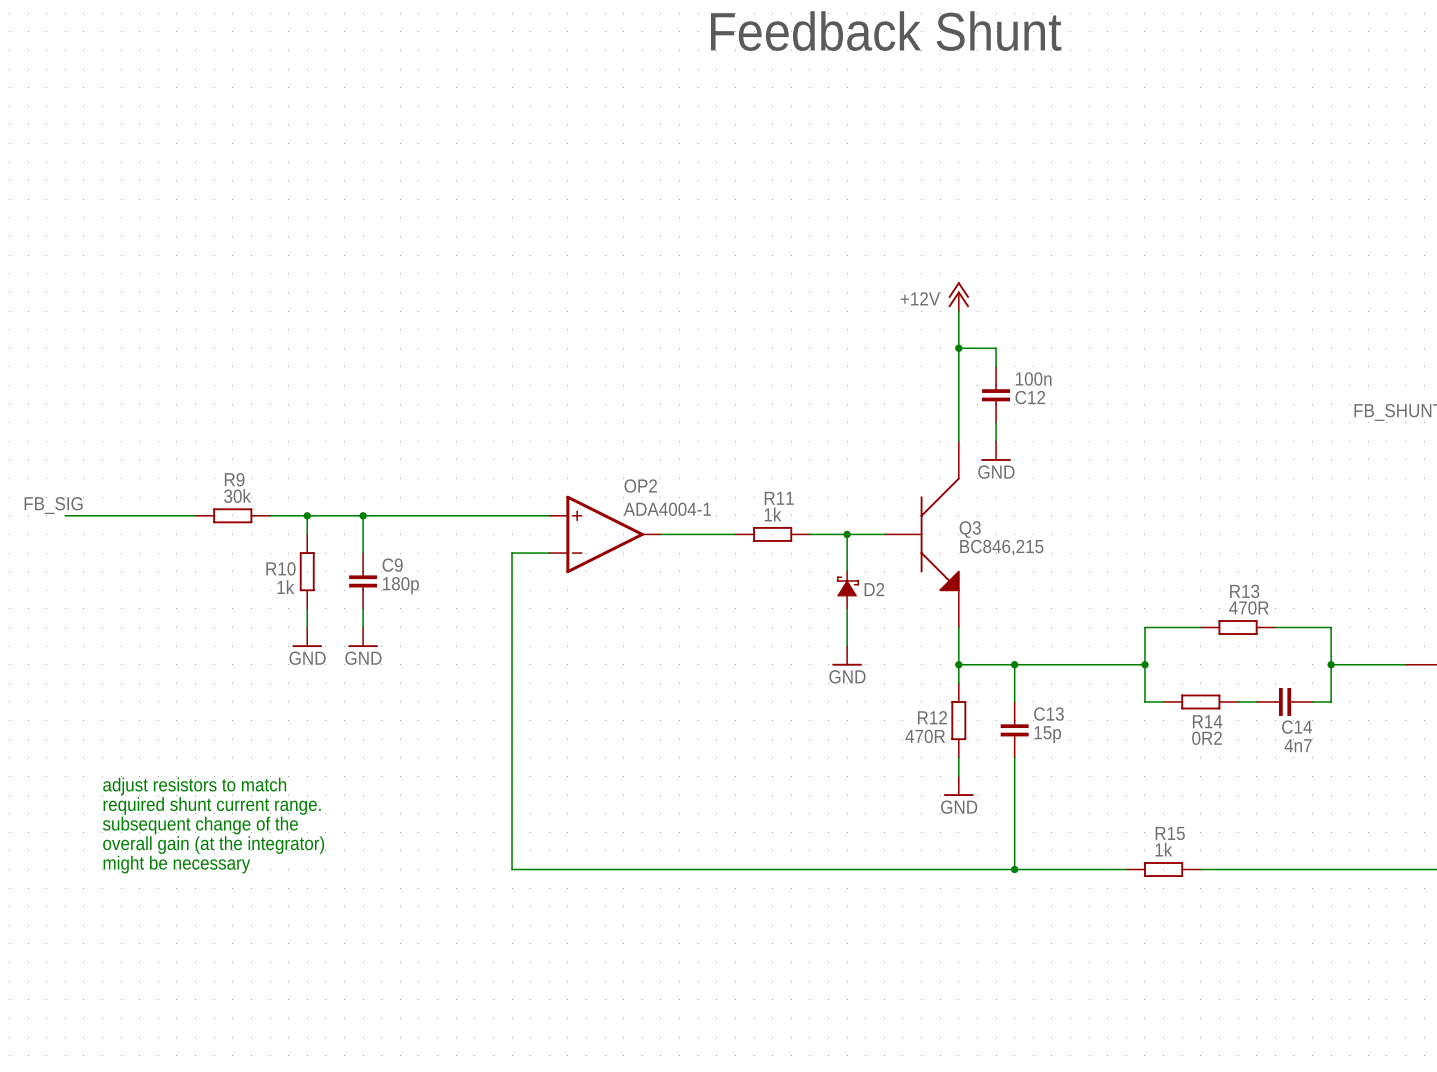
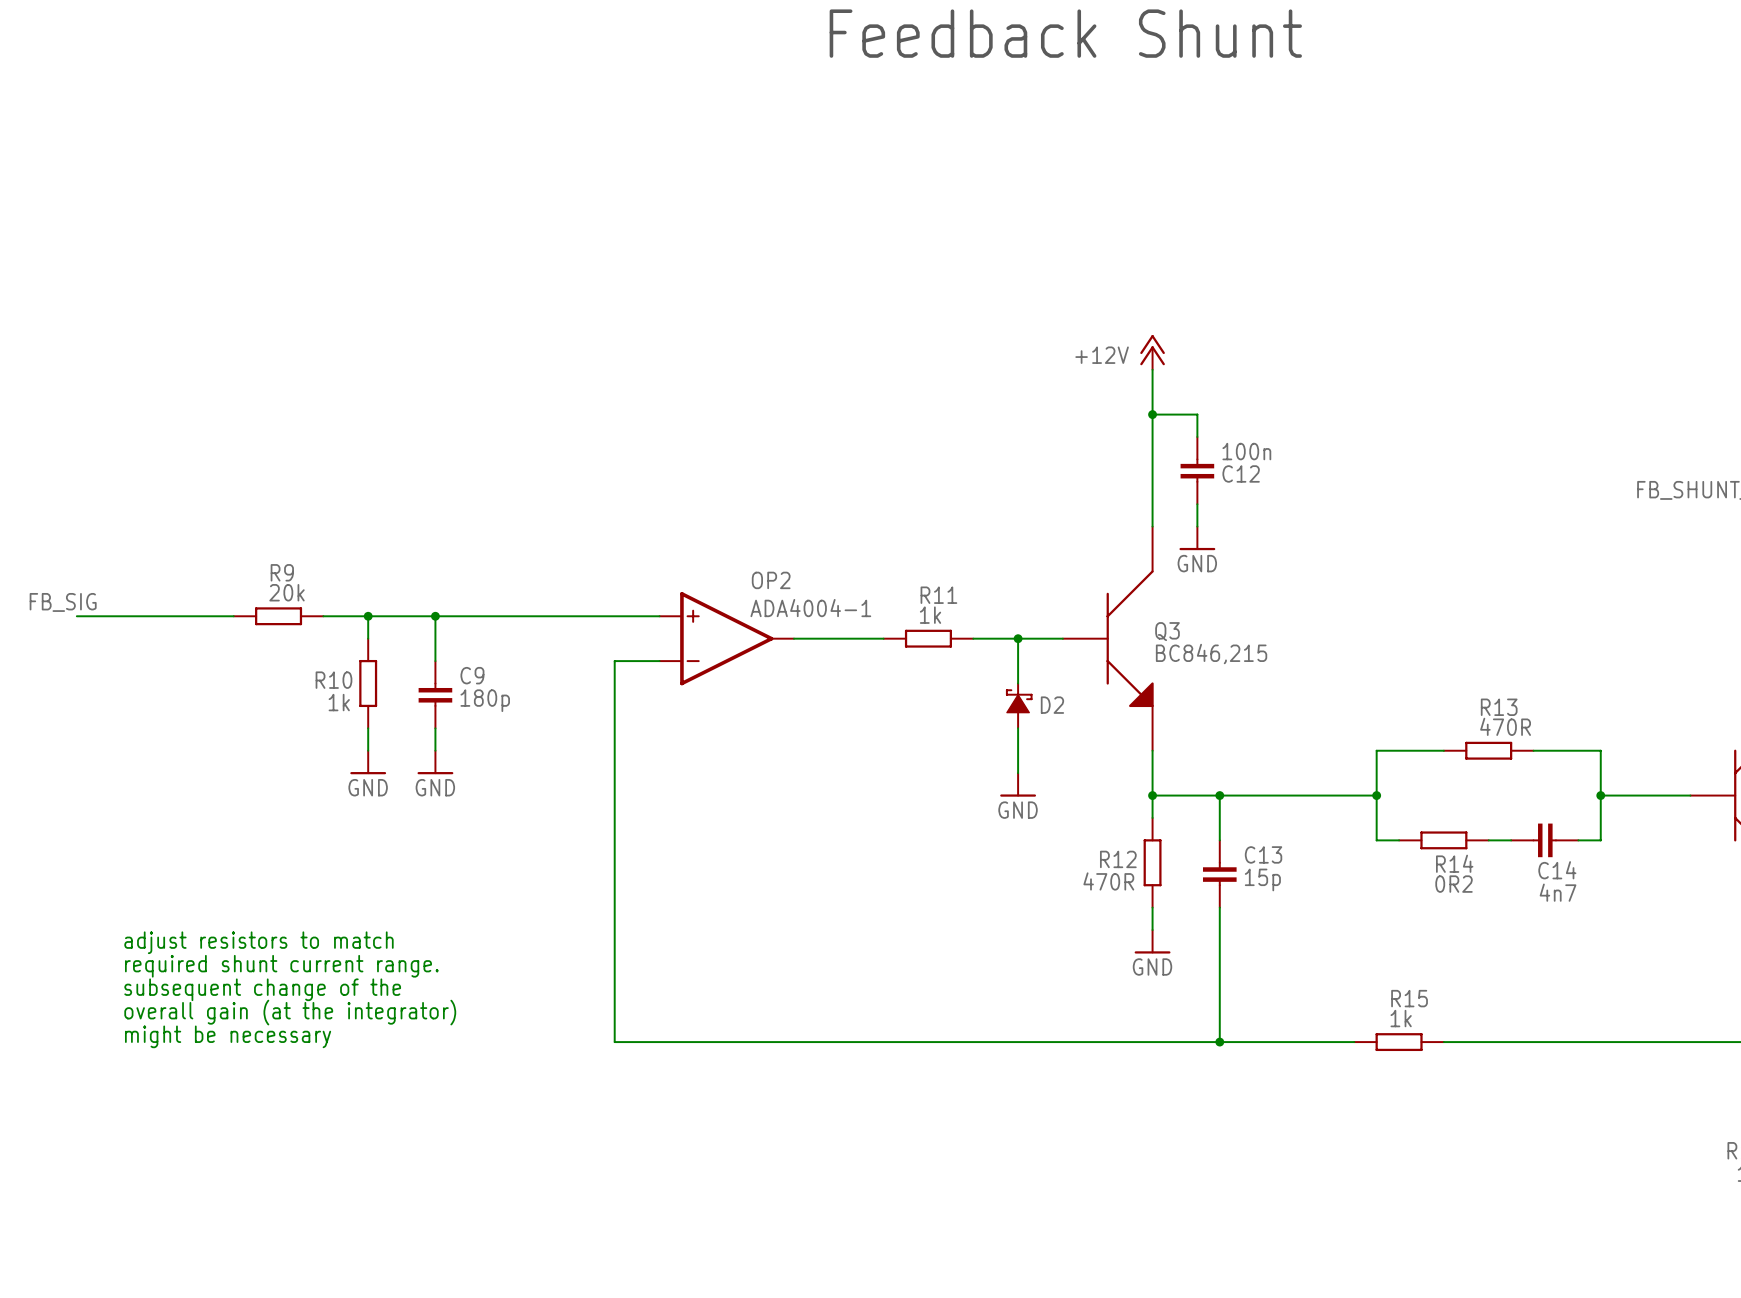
R9 value: 30k (237, 496) -> 20k (287, 592)

